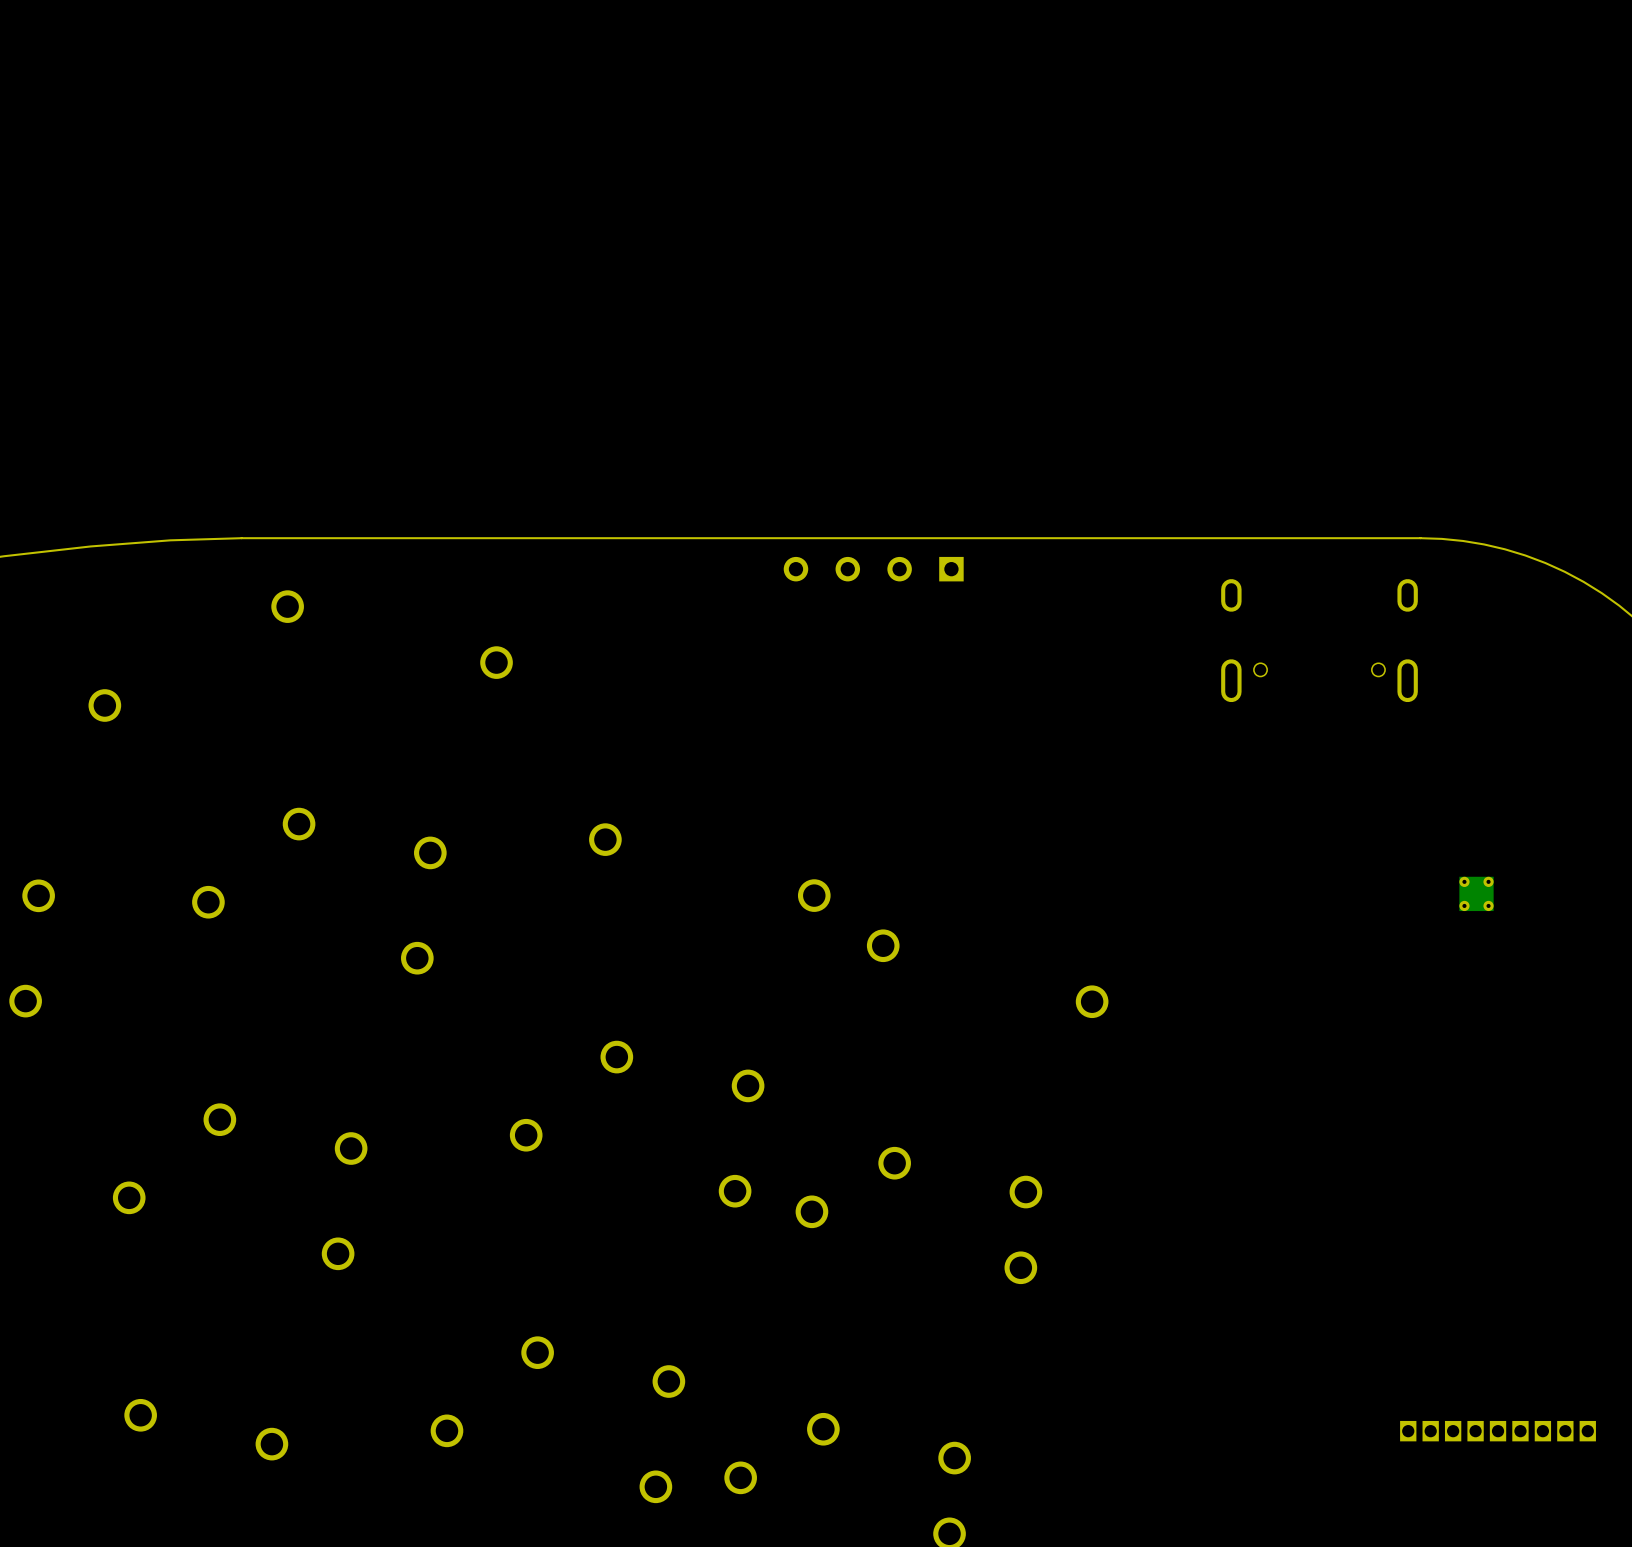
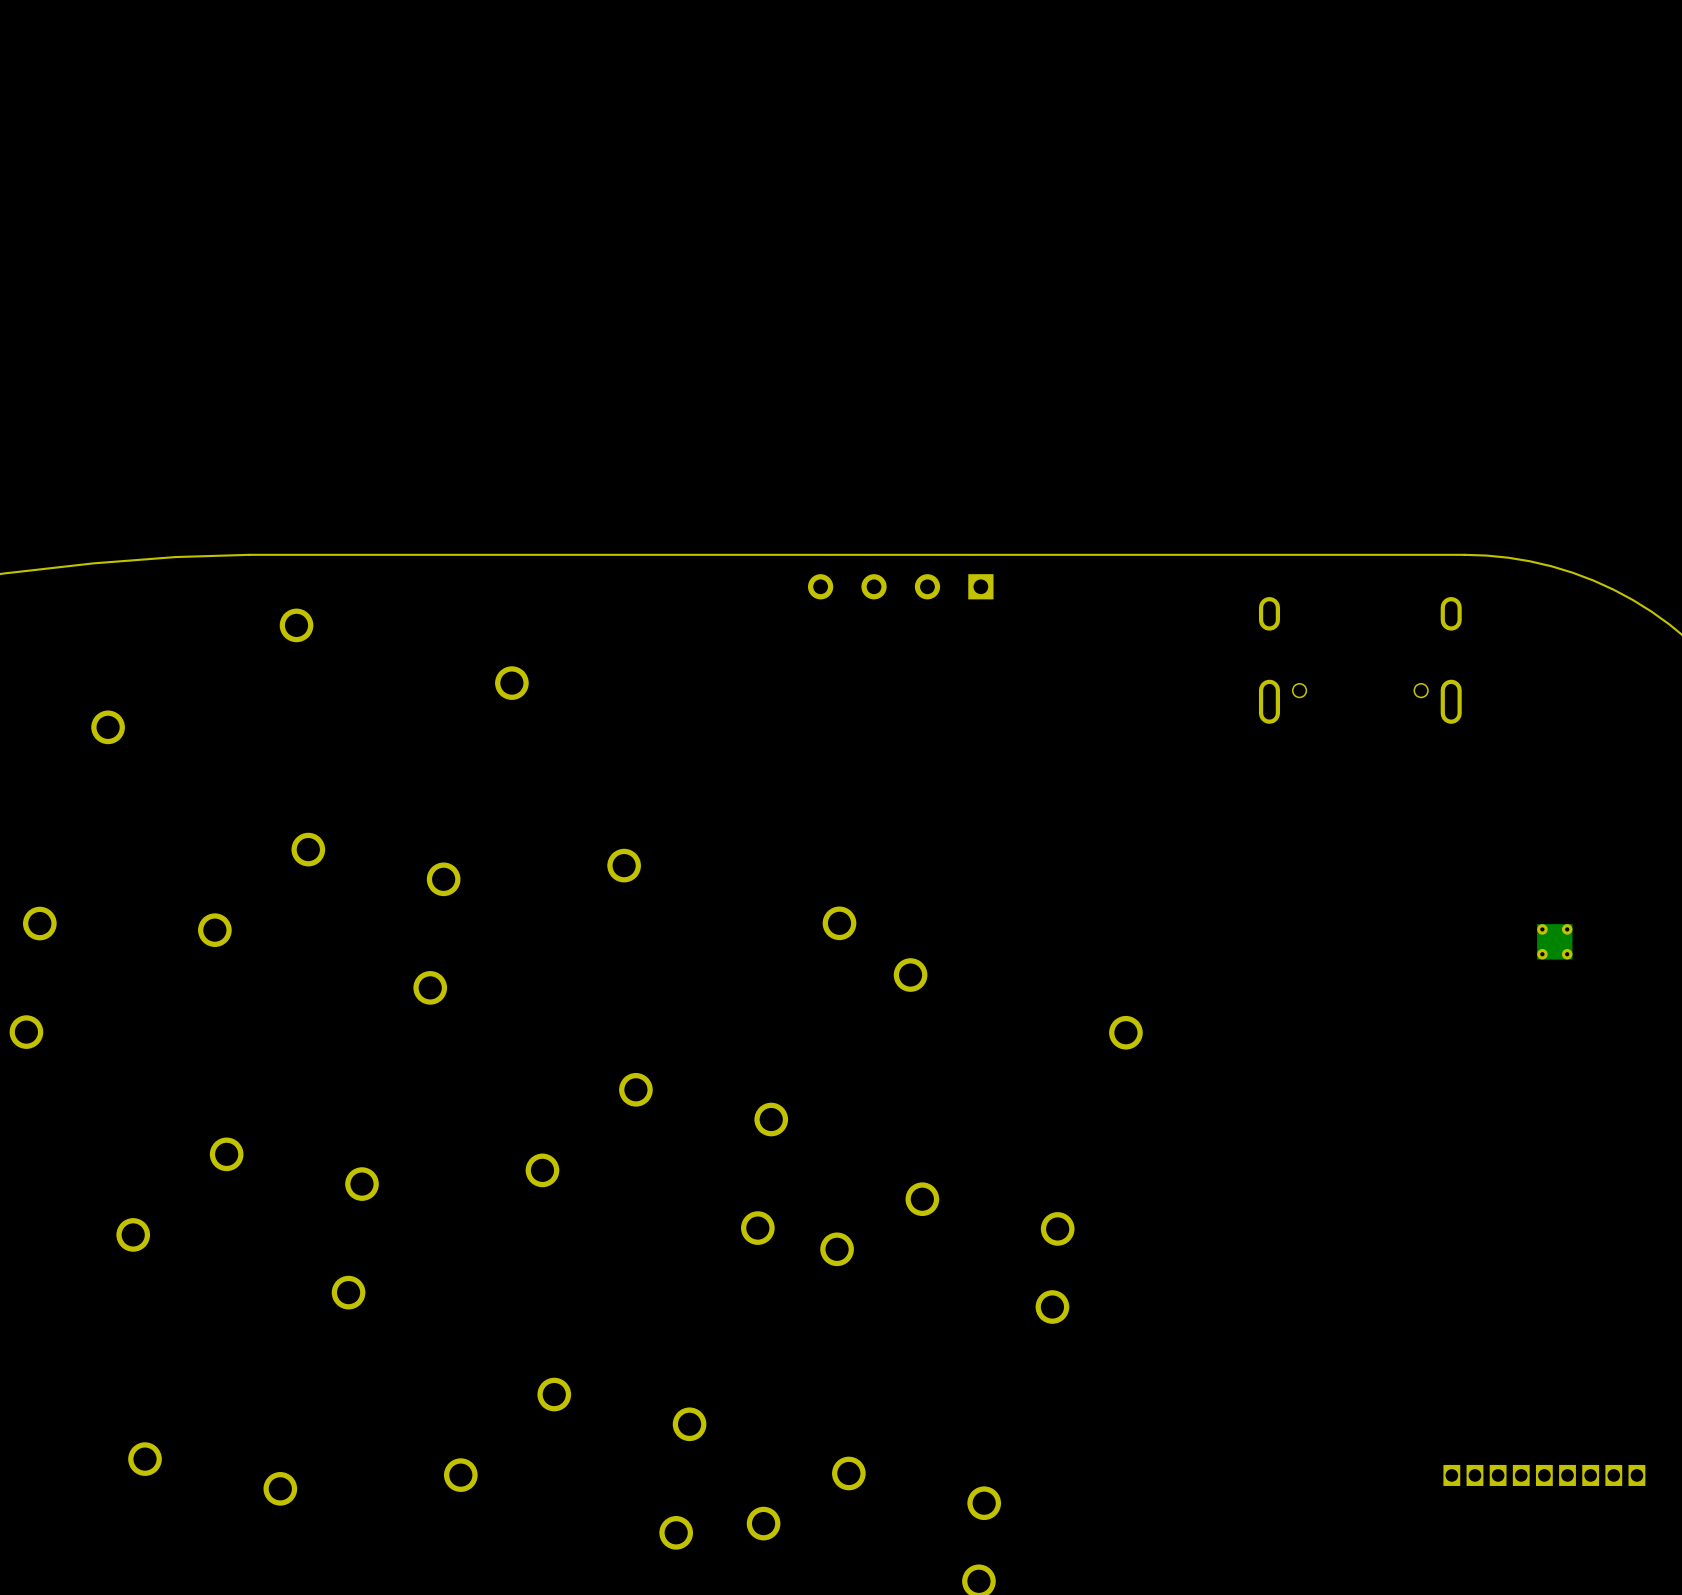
part position: (1476, 893) -> (1554, 941)

